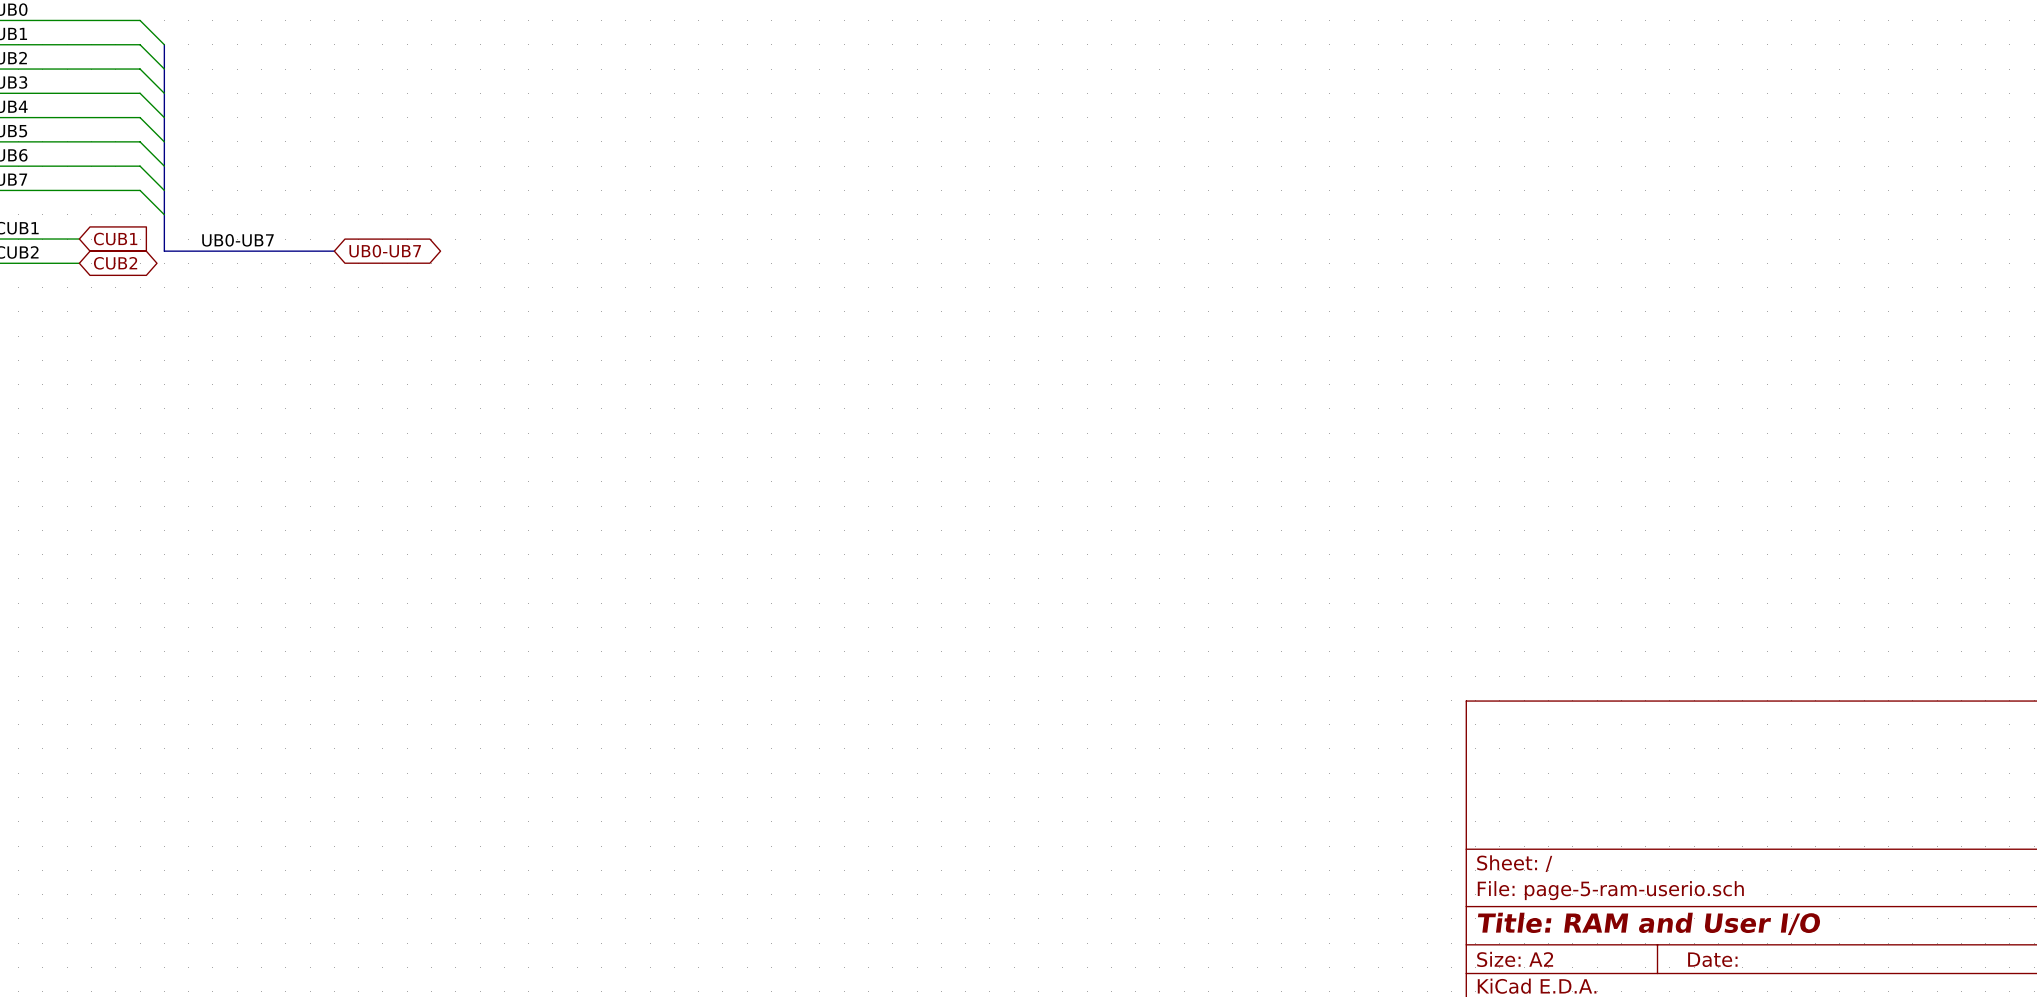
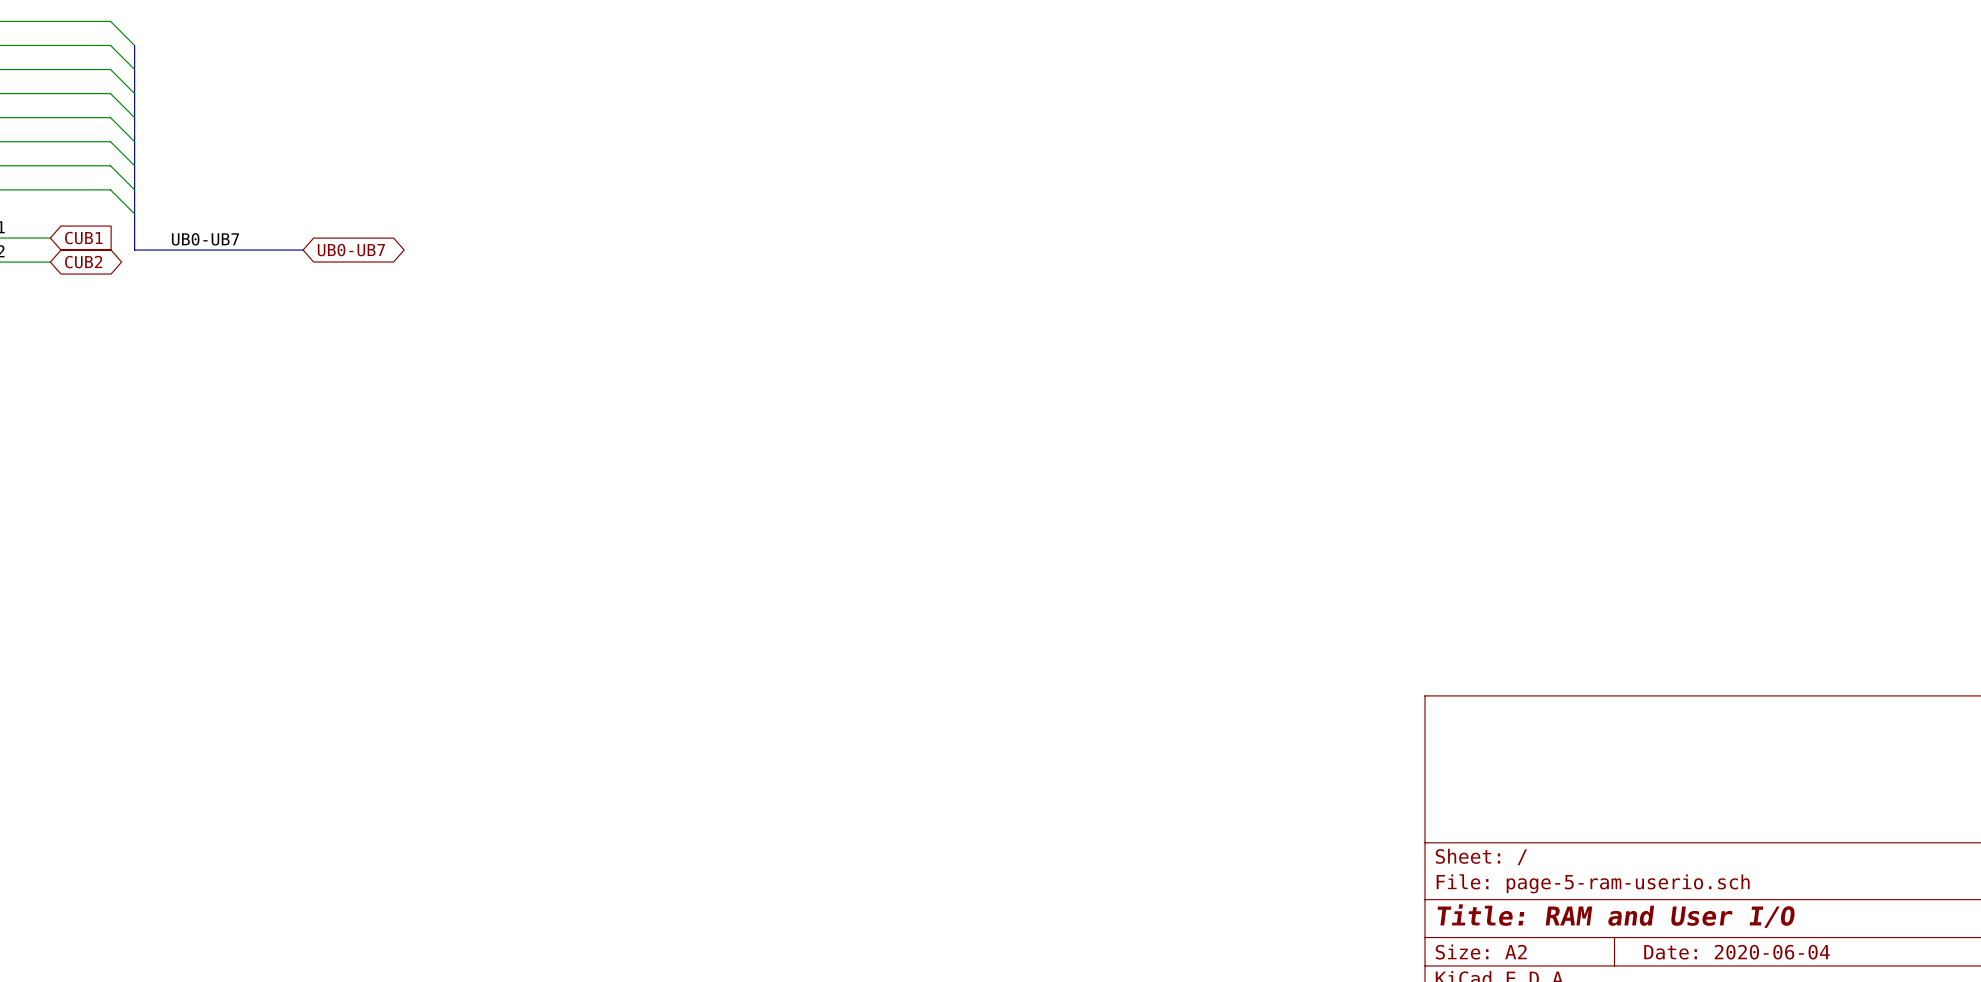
title block: Date: (1712, 959) -> Date: 2020-06-04 (1737, 952)

